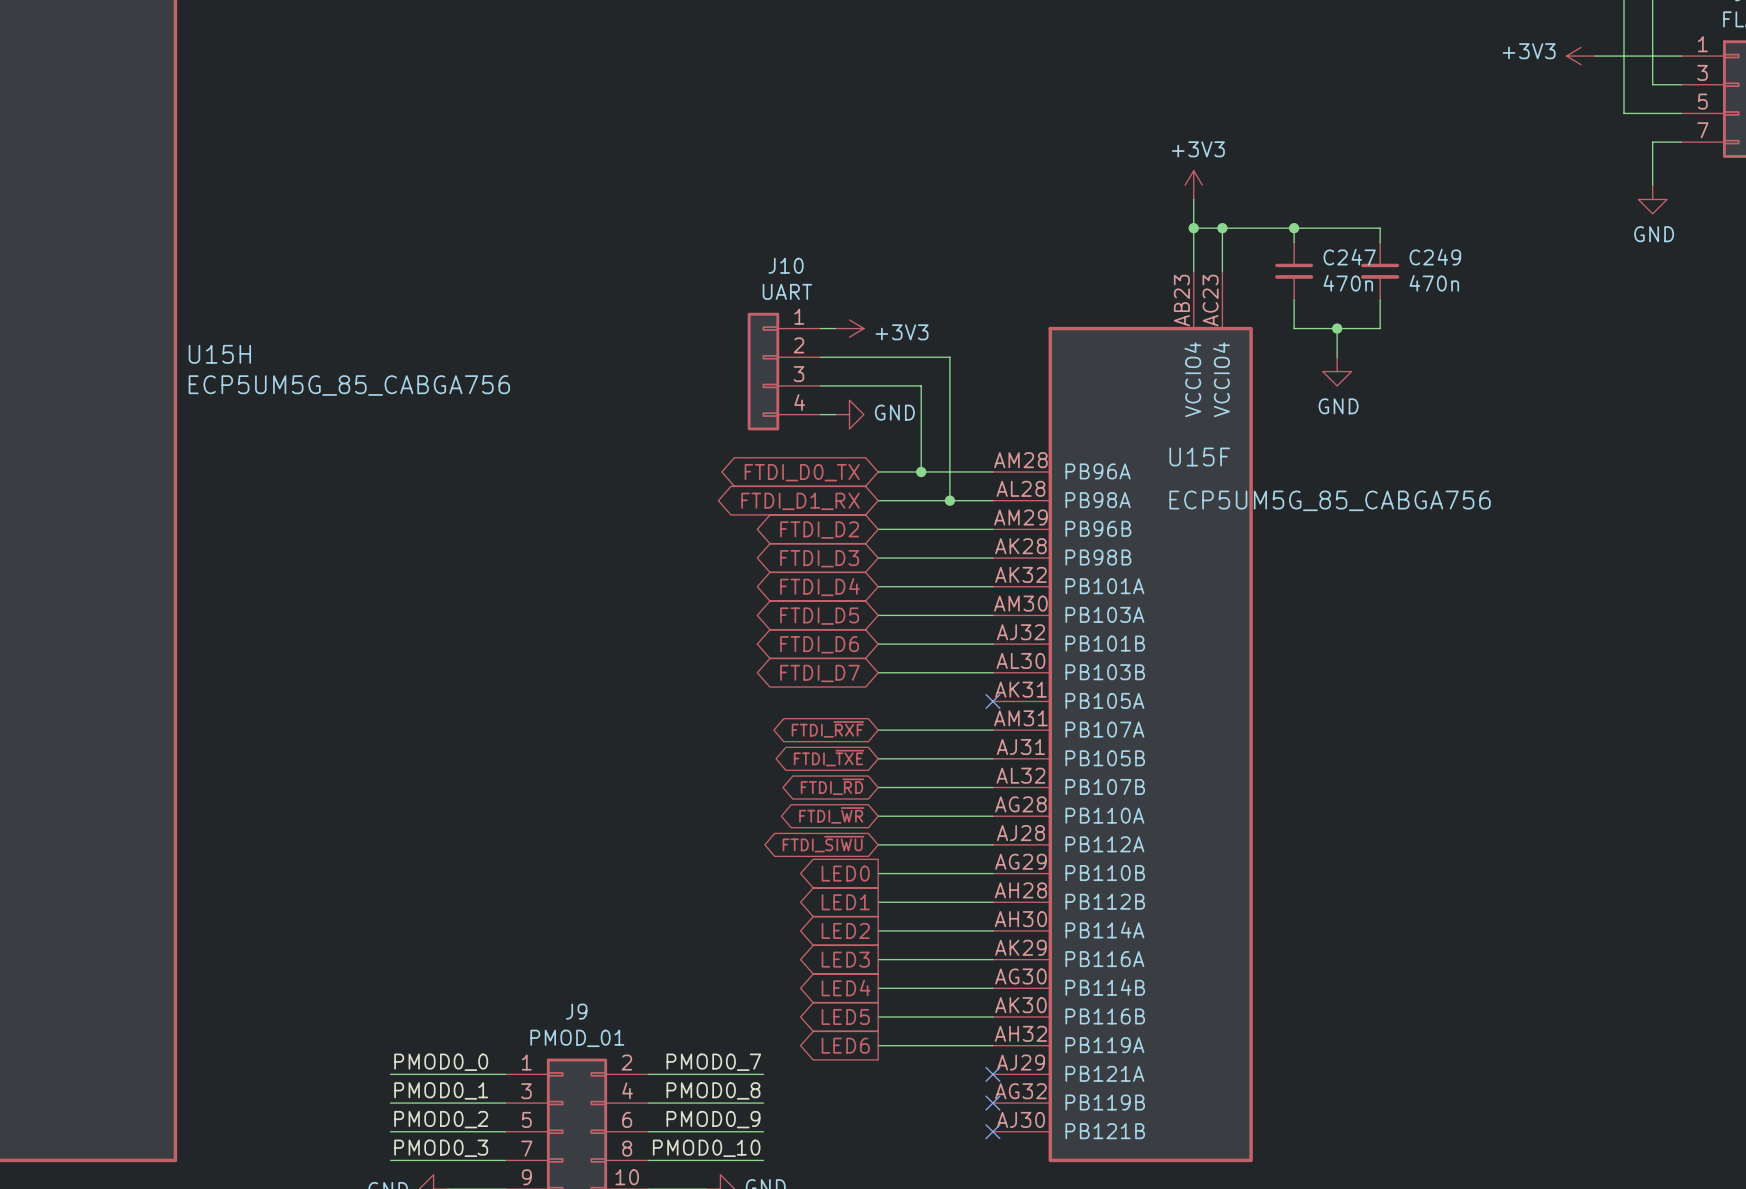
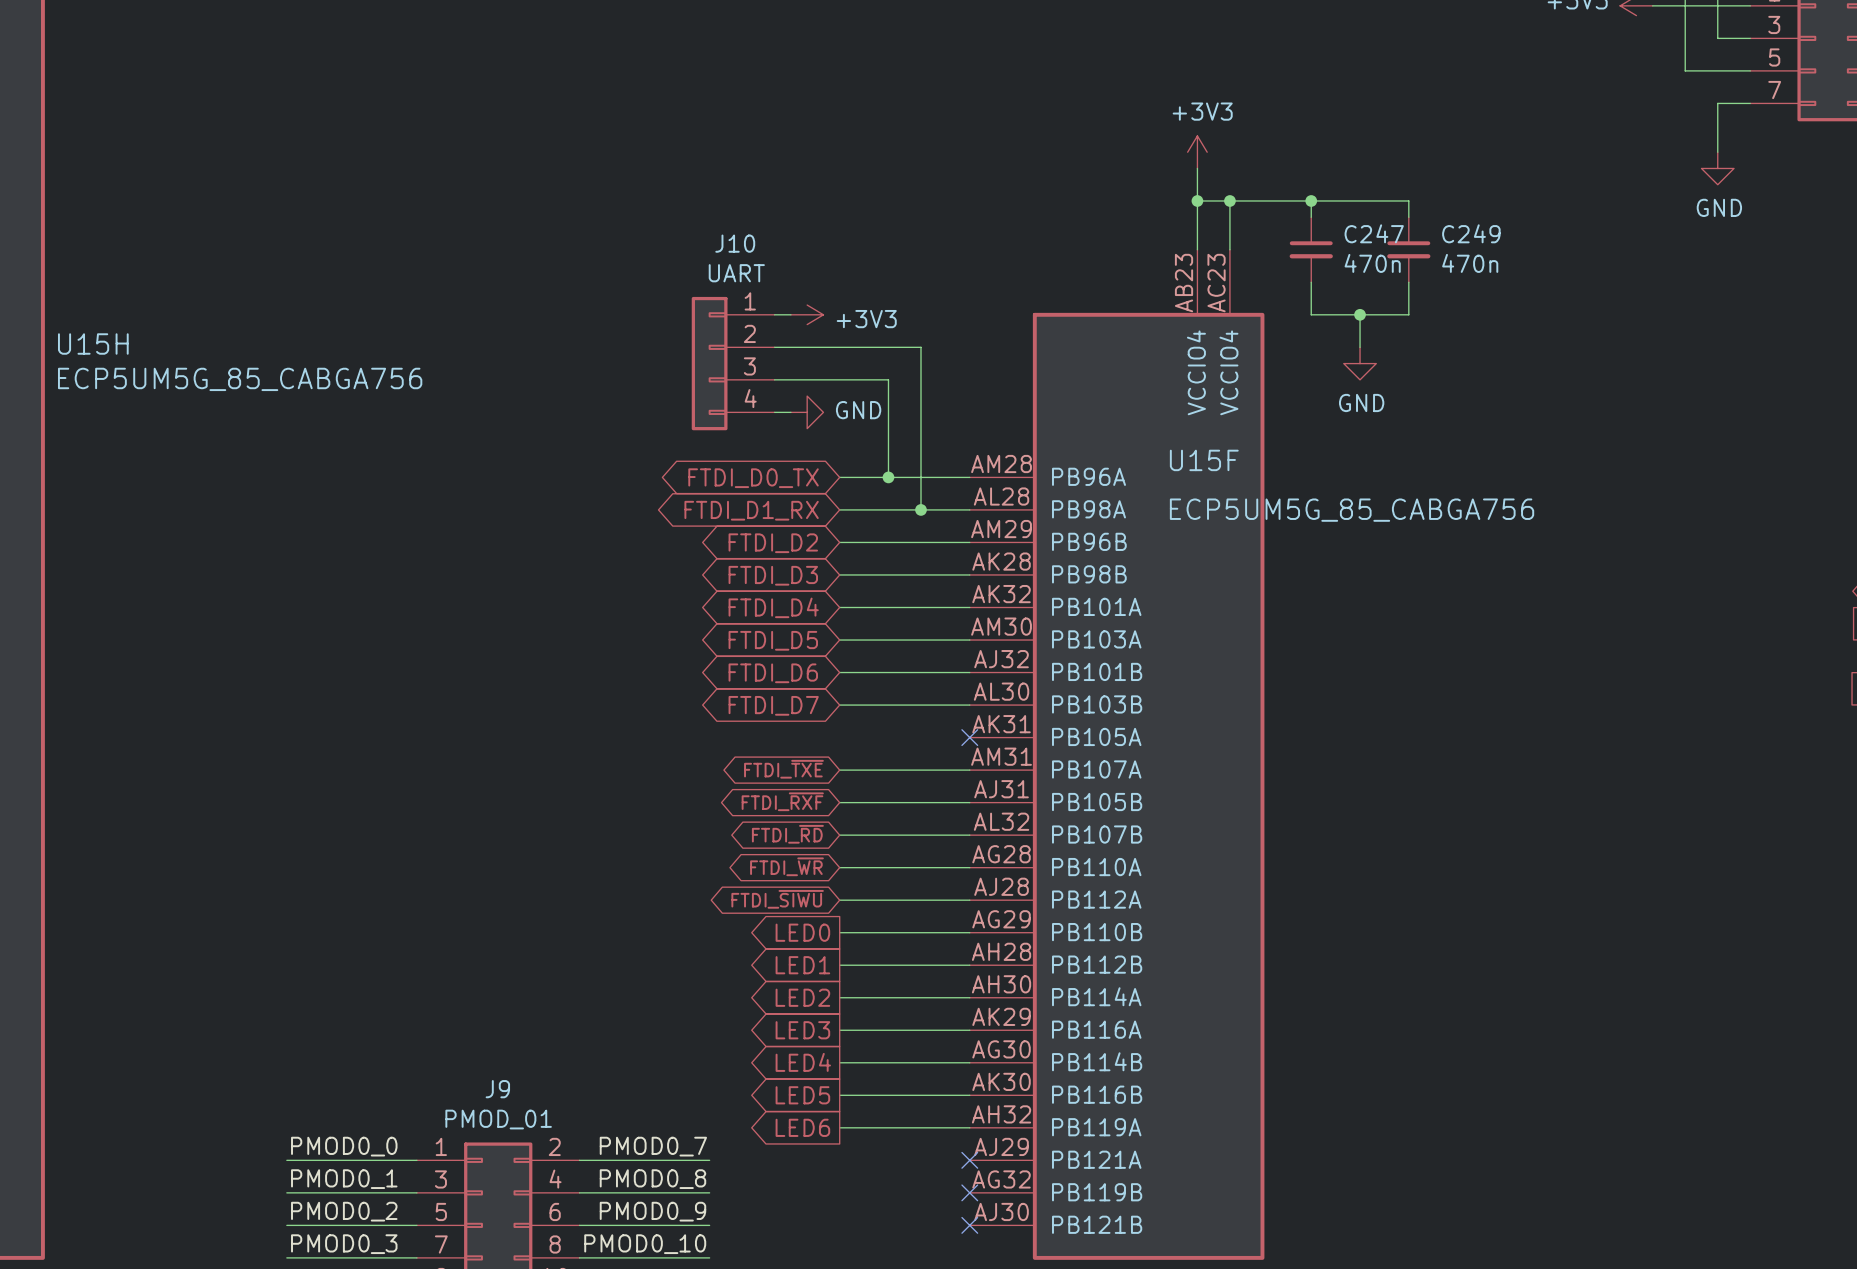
global label: FTDI_~{RXF} (827, 729) -> FTDI_~{TXE} (783, 769)
global label: FTDI_~{TXE} (829, 758) -> FTDI_~{RXF} (782, 801)

